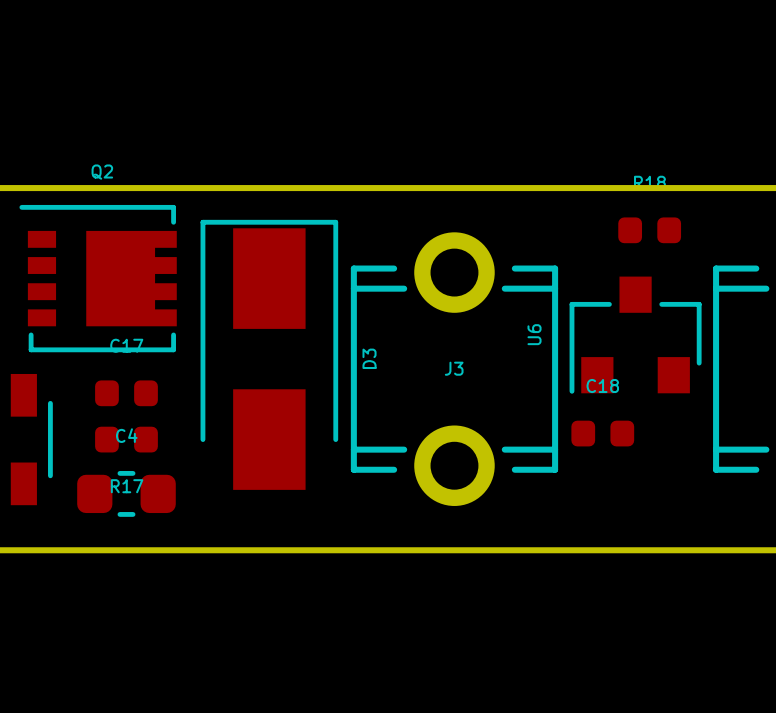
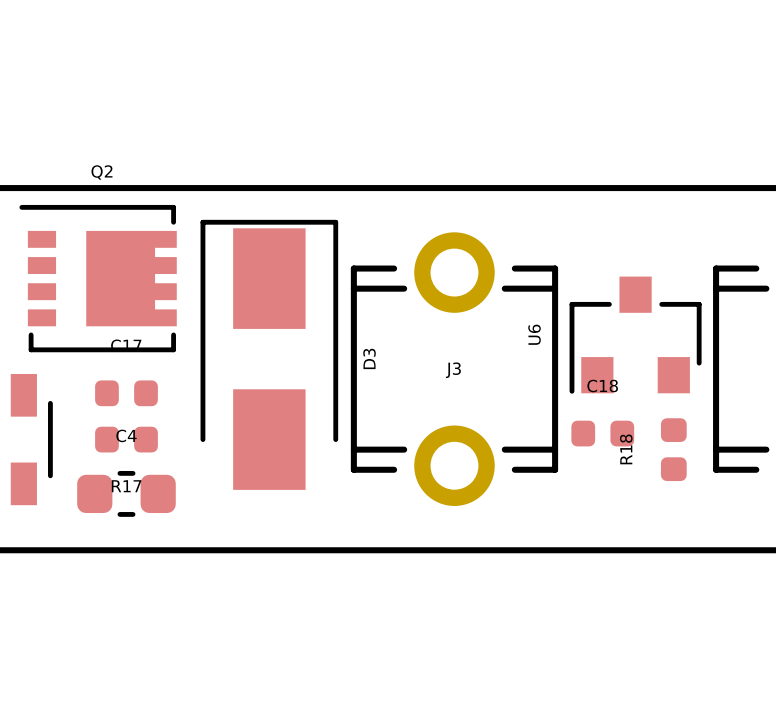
R18 rotation: 0° (649, 230) -> 90° clockwise (673, 449)
R18 position: (649, 230) -> (673, 449)

